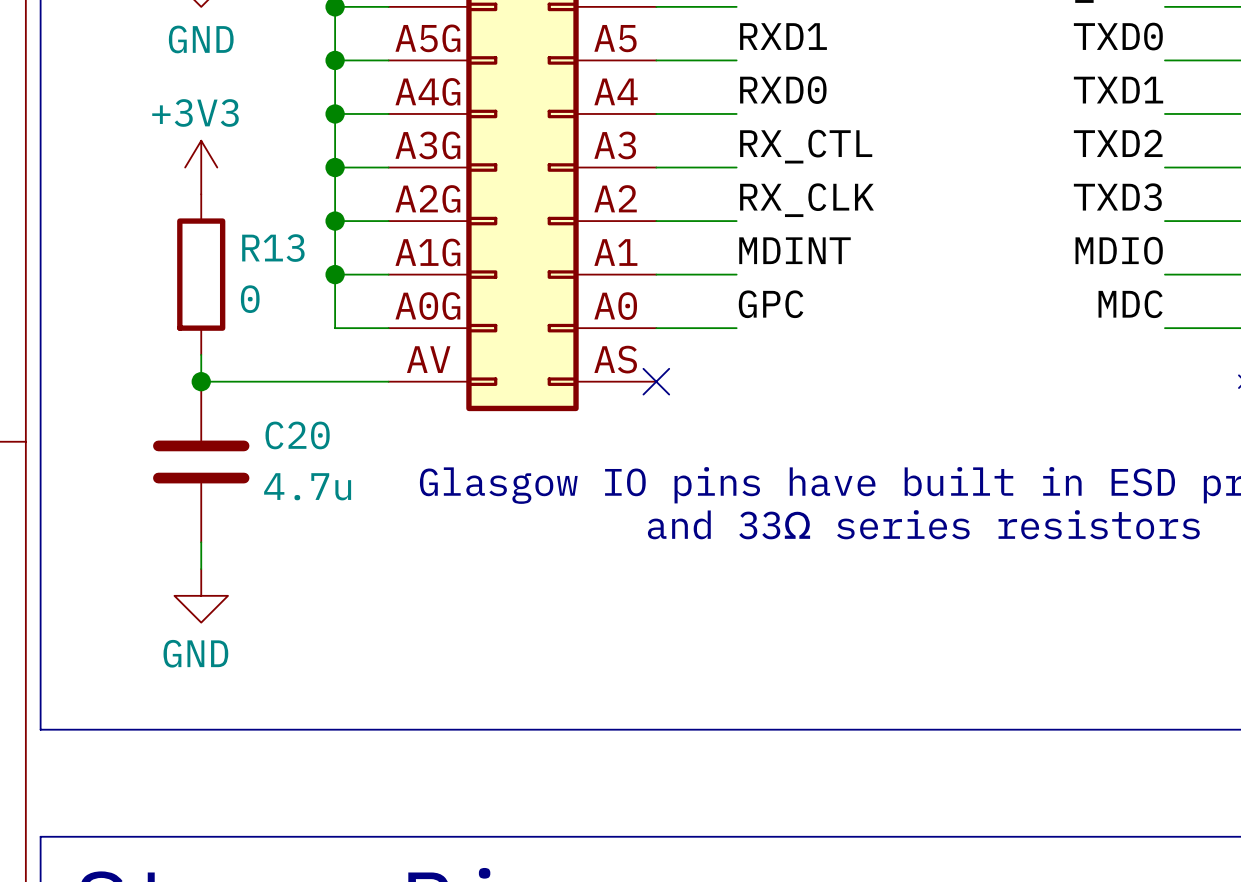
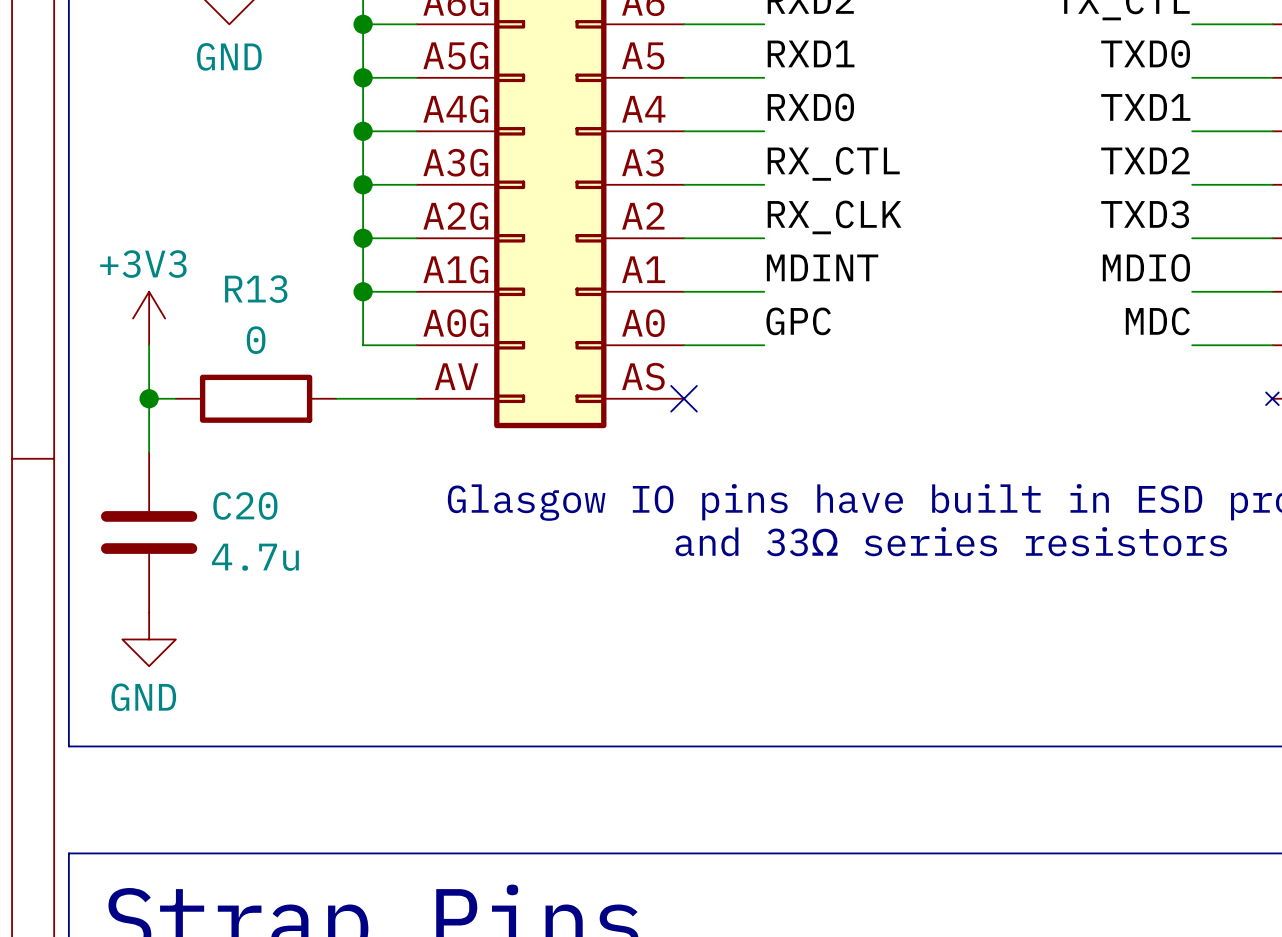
power symbol position: +3V3 (201, 167) -> +3V3 (149, 318)
R13 name position: R13 (273, 248) -> R13 (256, 289)
R13 rotation: 0° (201, 274) -> 90° clockwise (256, 398)
R13 position: (201, 274) -> (256, 398)
R13 value position: 0 (250, 299) -> 0 (256, 340)
wire: none -> (149, 345) (149, 452)
wire: (201, 354) (201, 381) (308, 381) -> none
wire: none -> (149, 398) (175, 398)
junction position: (201, 381) -> (149, 398)
C20 position: (201, 461) -> (149, 532)
wire: (201, 542) (201, 569) -> none
power symbol position: GND (201, 595) -> GND (149, 639)

